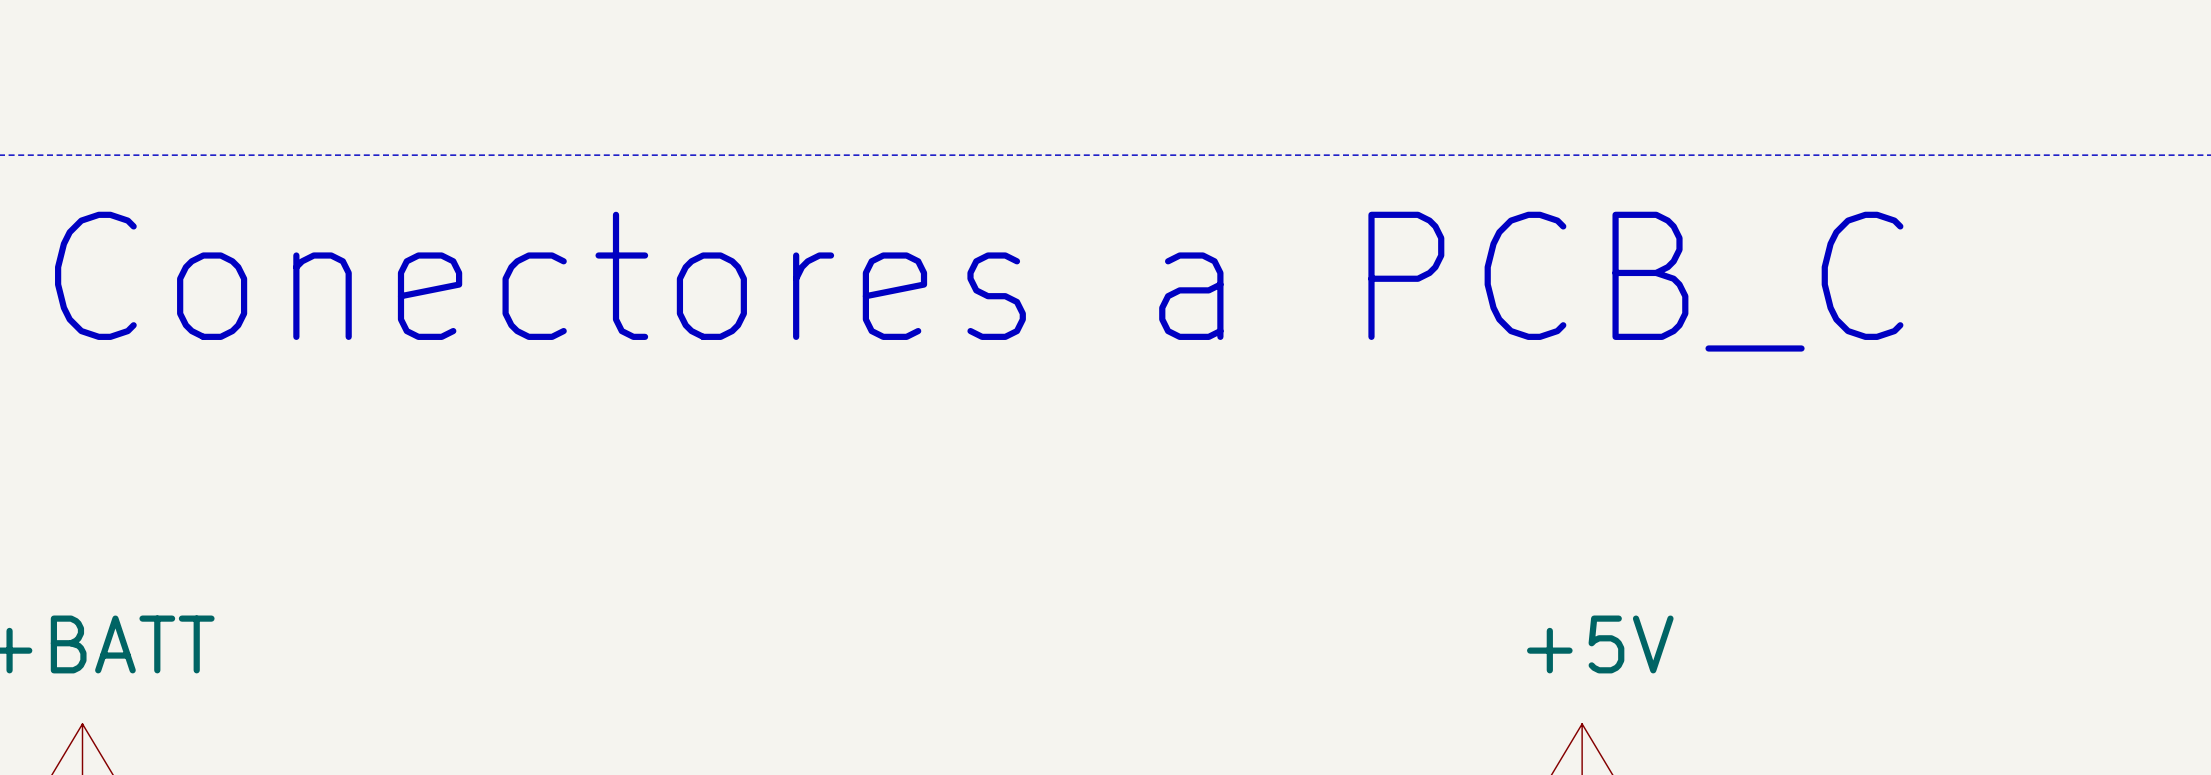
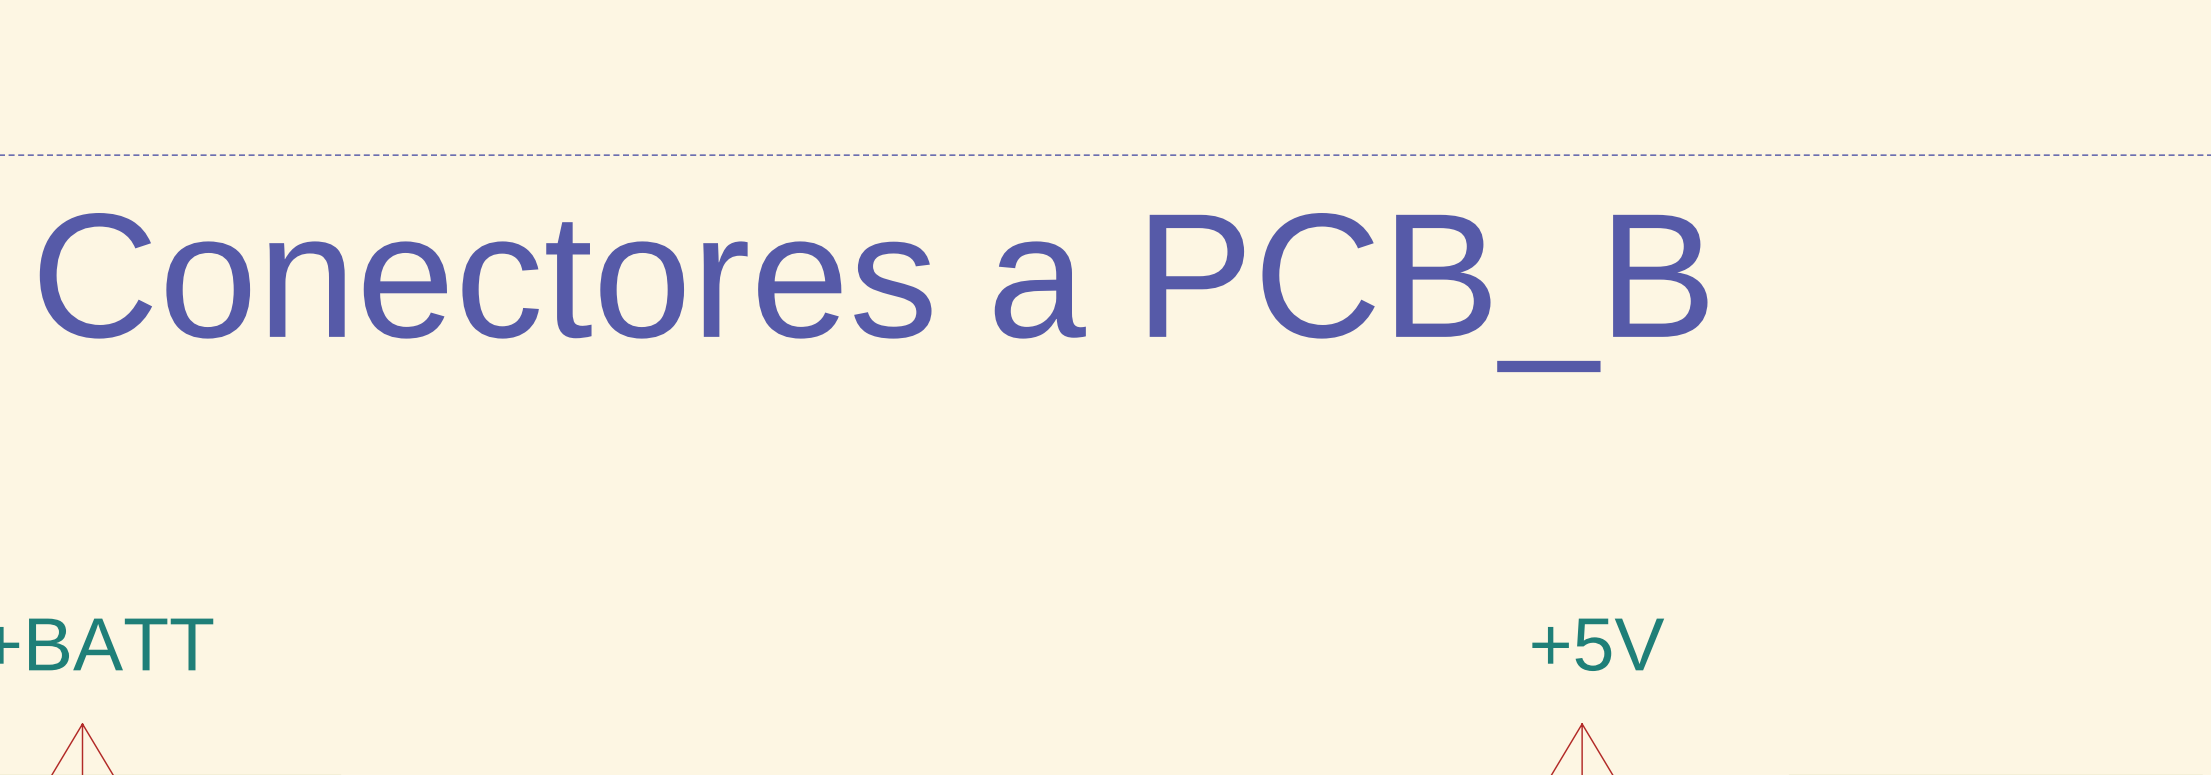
text: Conectores a PCB_C (979, 281) -> Conectores a PCB_B (873, 292)

